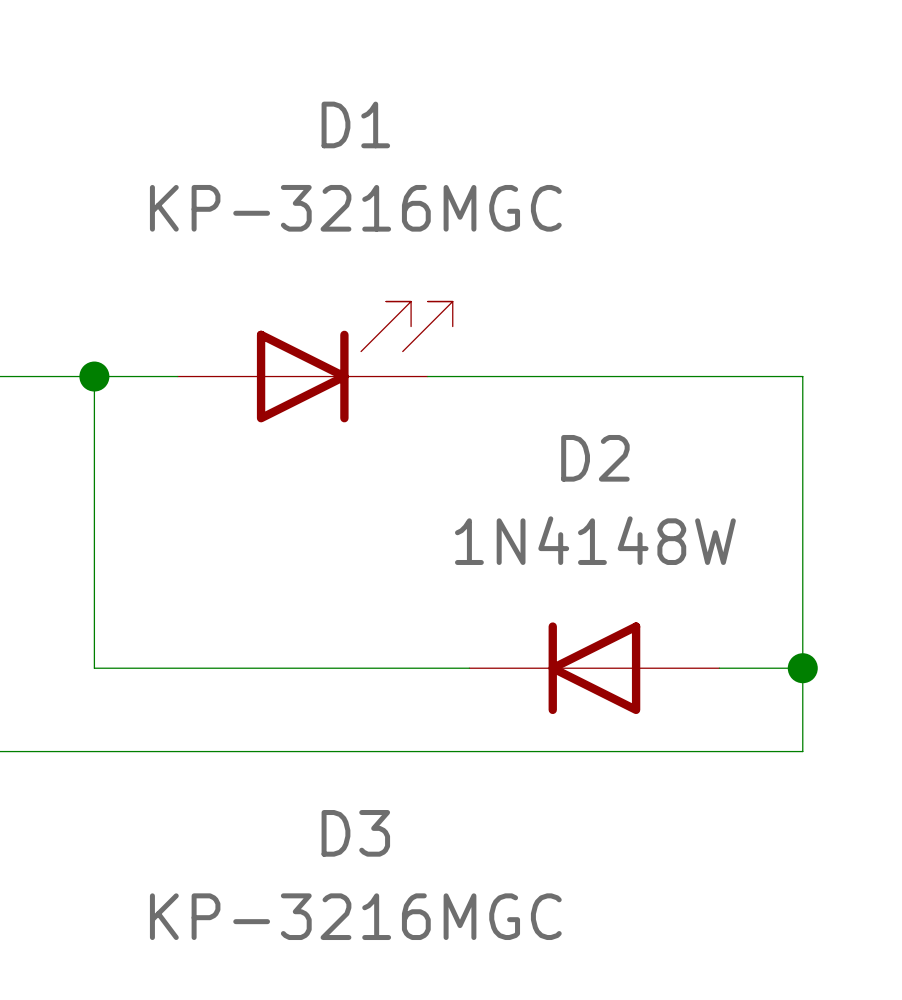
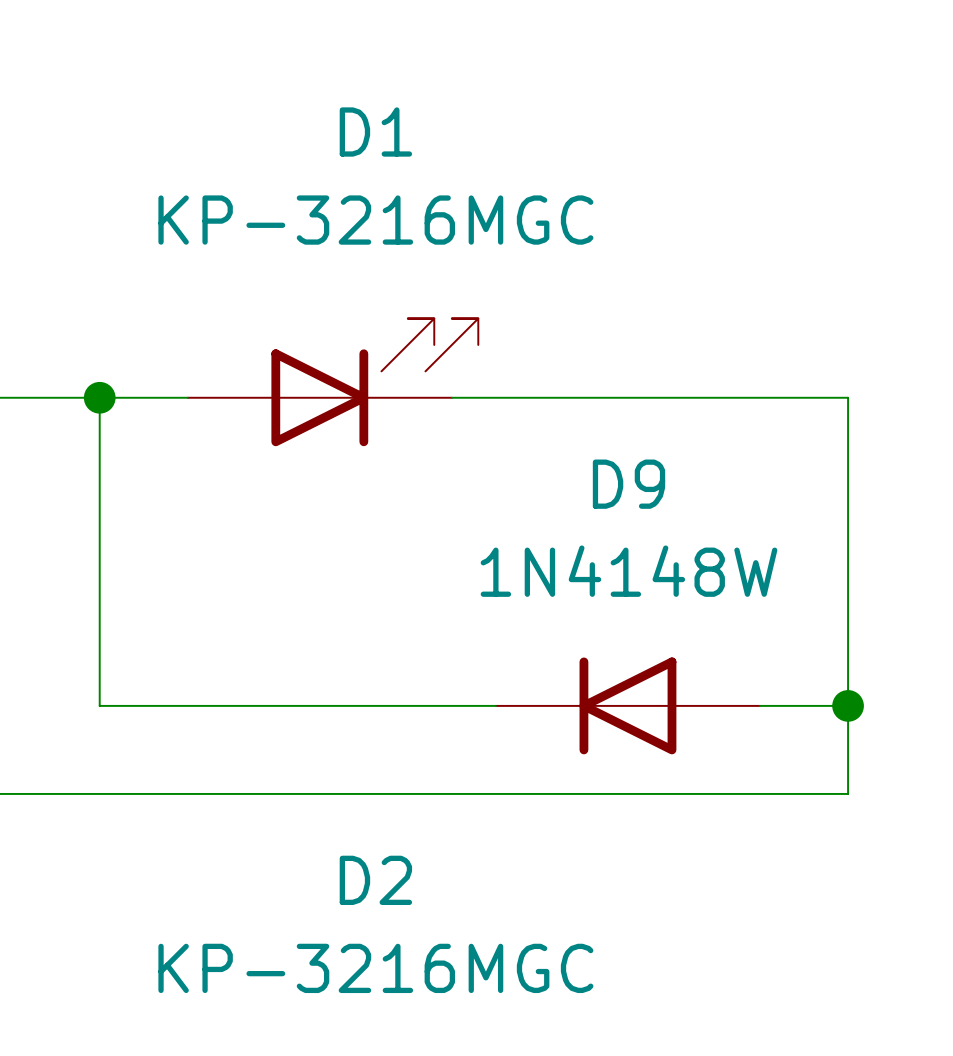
D2 name: D2 (595, 458) -> D9 (629, 484)
D3 name: D3 (355, 833) -> D2 (375, 880)

